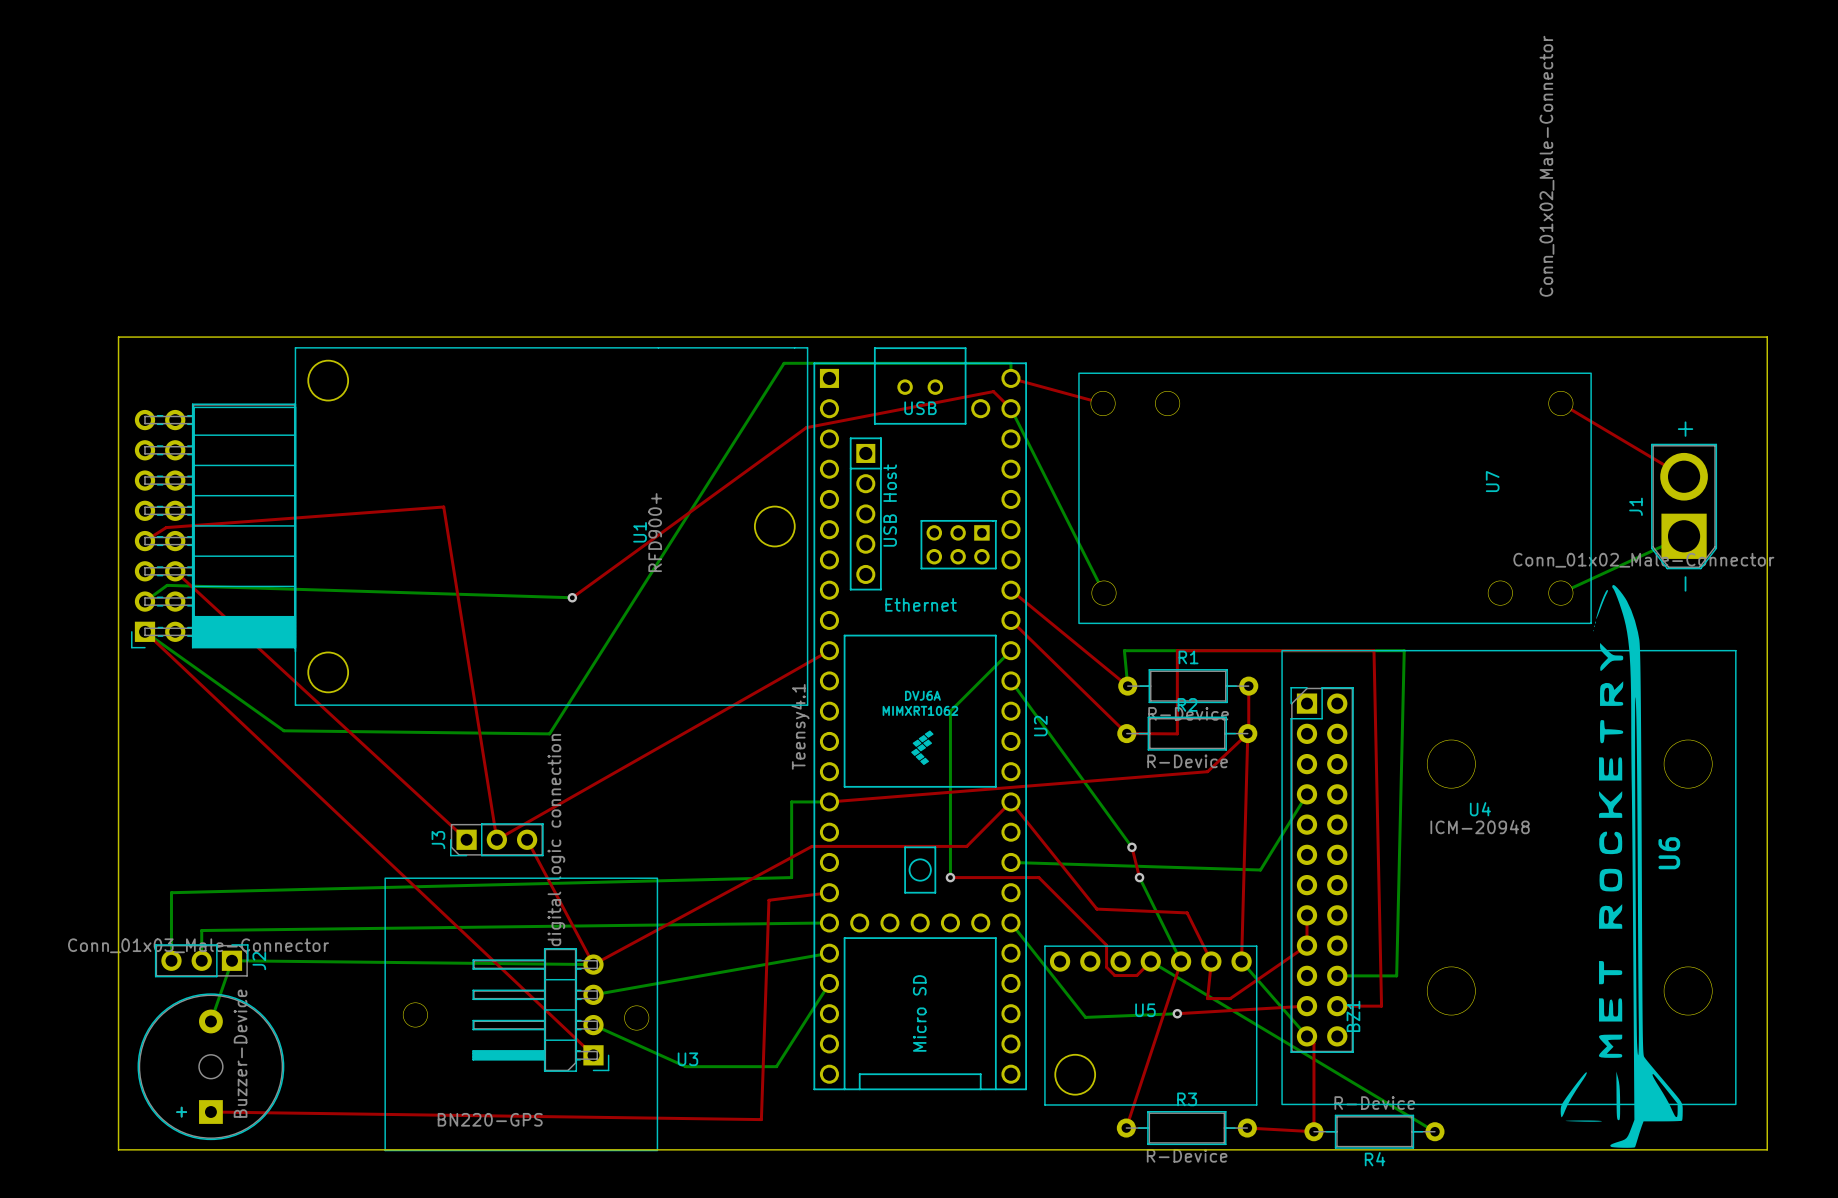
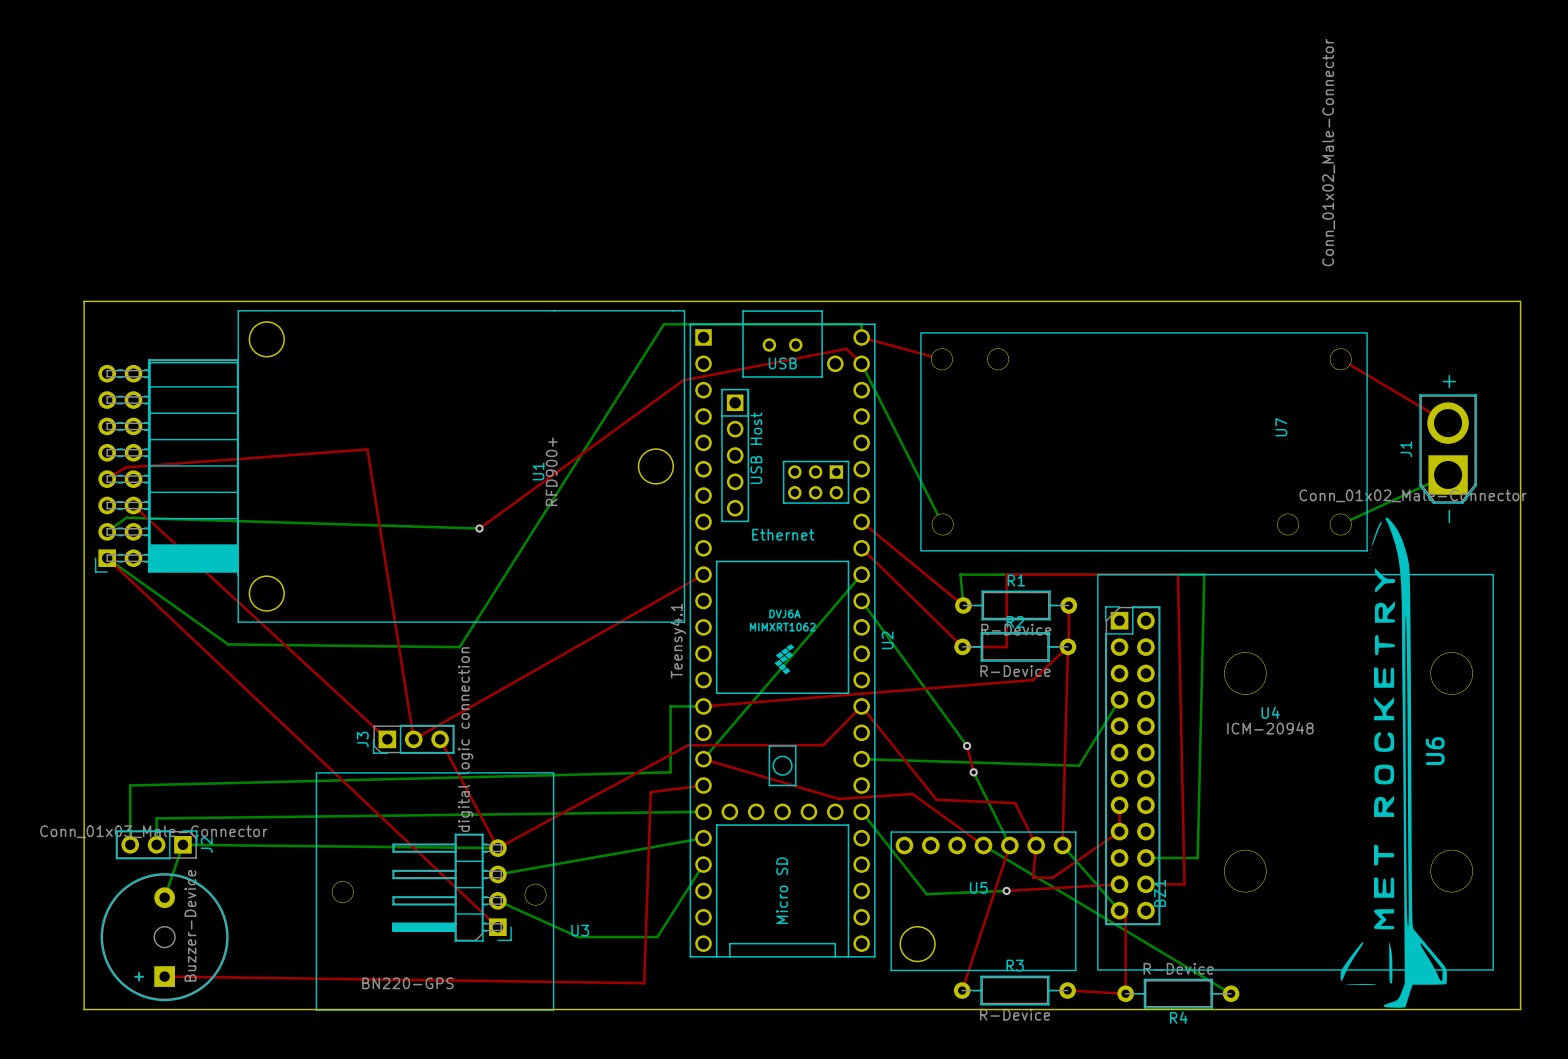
bottom track: (1010, 650) (950, 711) (950, 877) -> (861, 574) (703, 759)
top track: (950, 877) (1038, 877) (1106, 945) (1106, 967) (1114, 975) (1136, 975) (1150, 961) -> (703, 759) (838, 798) (912, 794) (983, 845)
via: (950, 877) -> none

